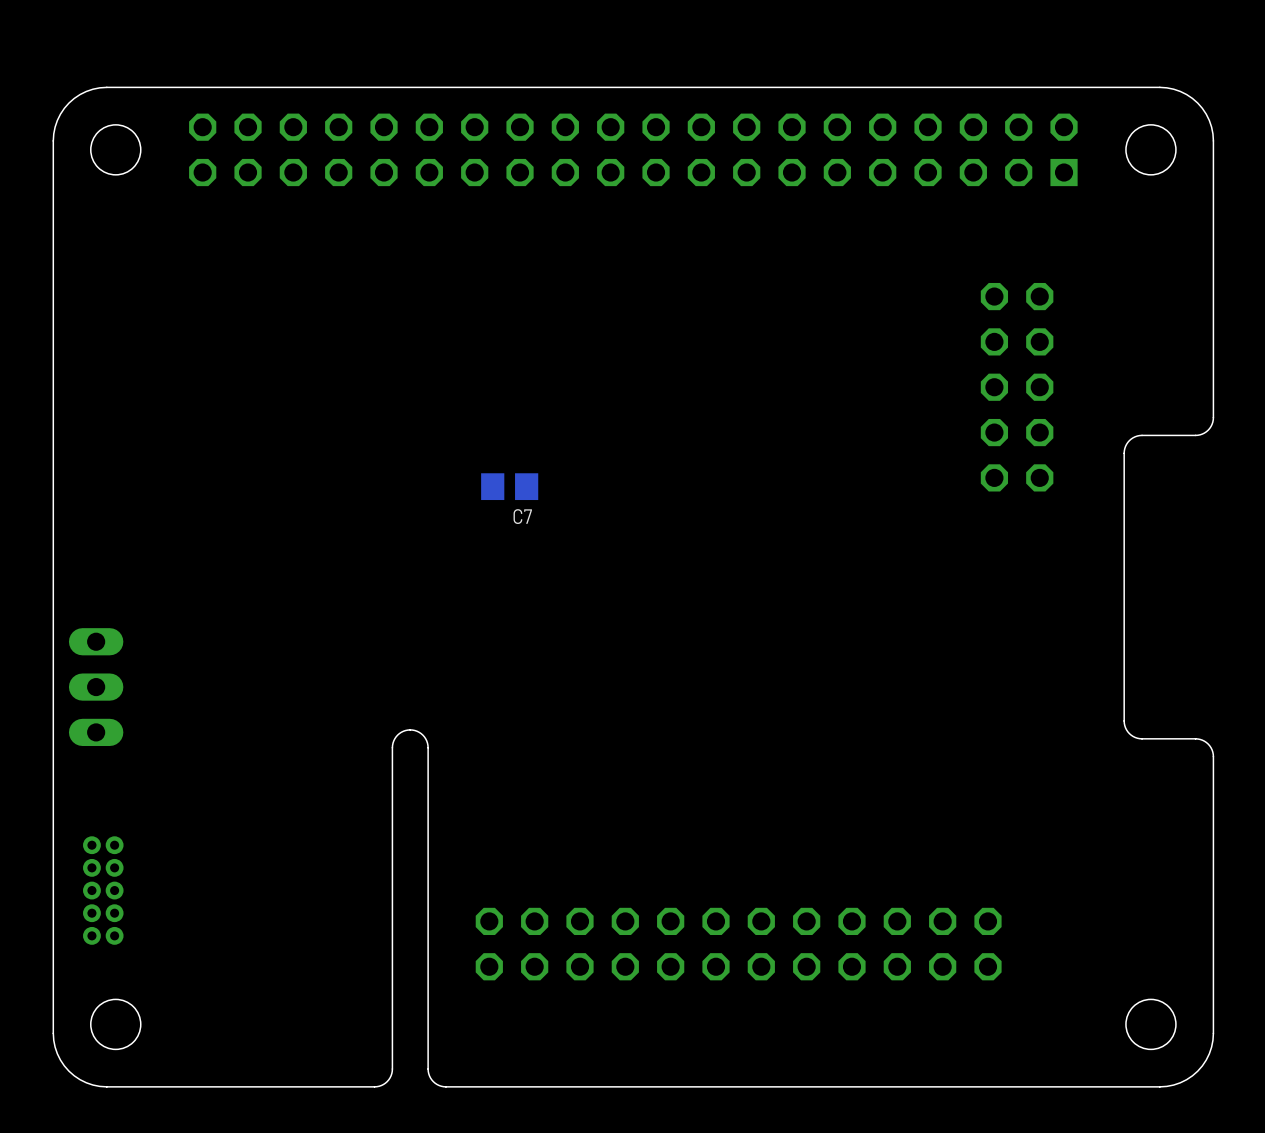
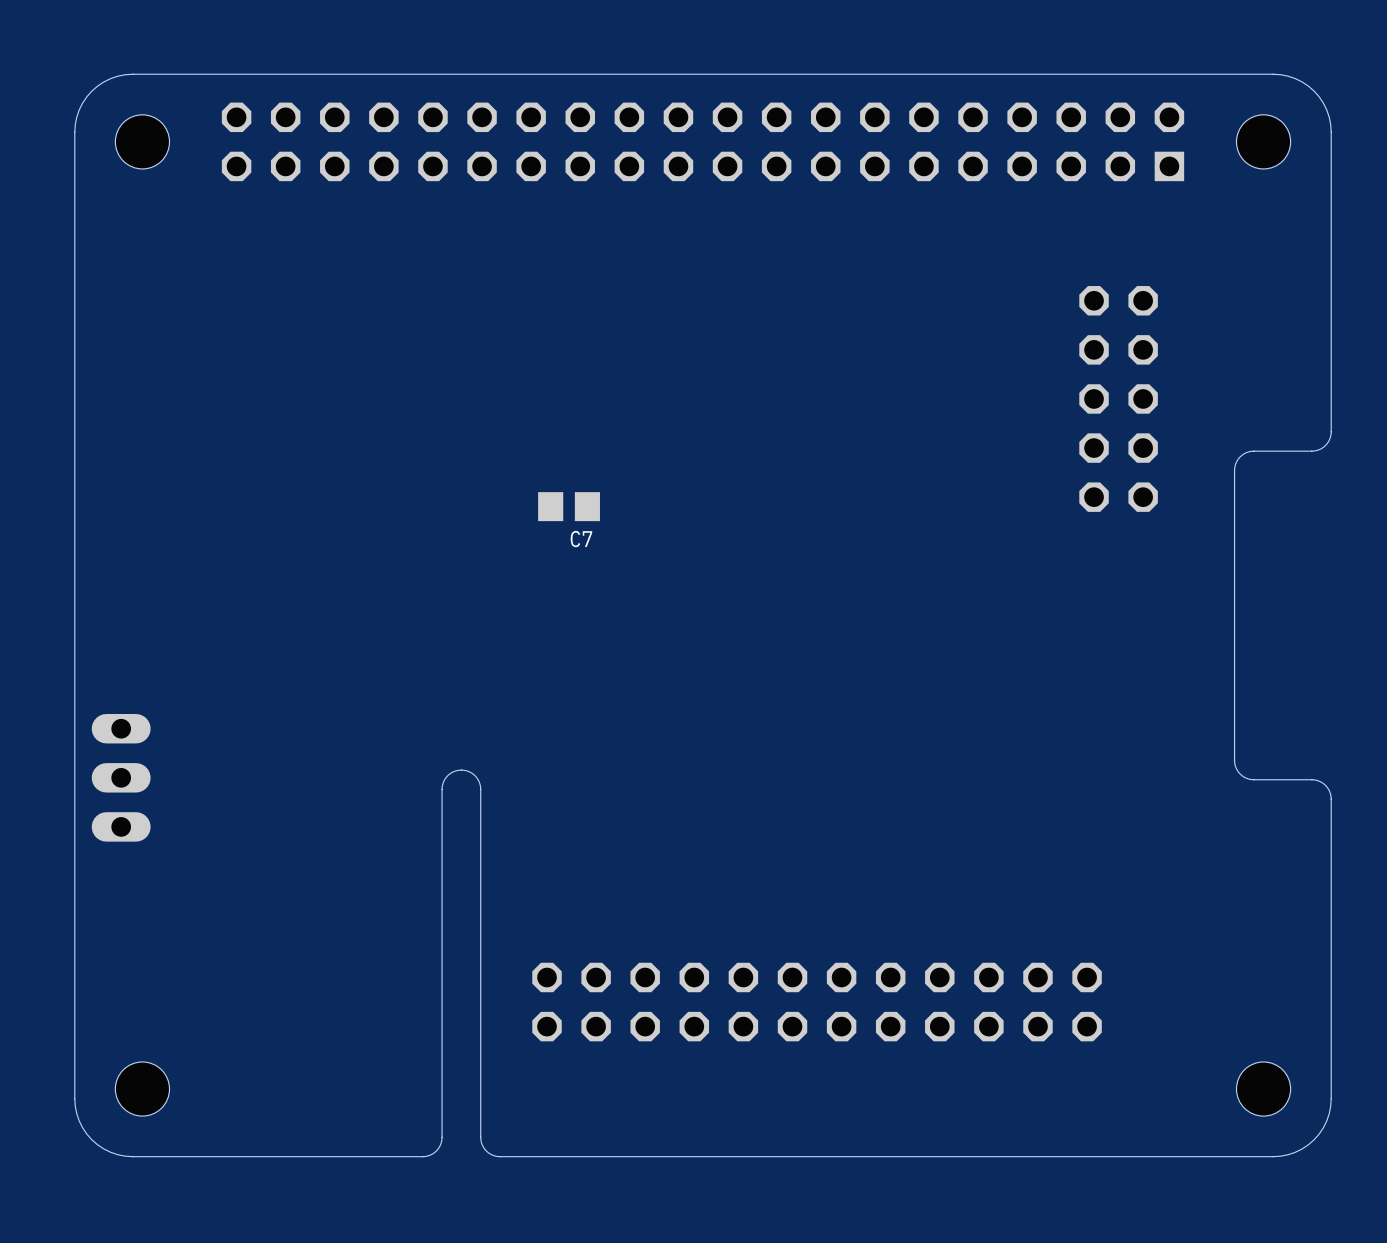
part position: (96, 687) -> (121, 777)
part: (103, 890) -> none

